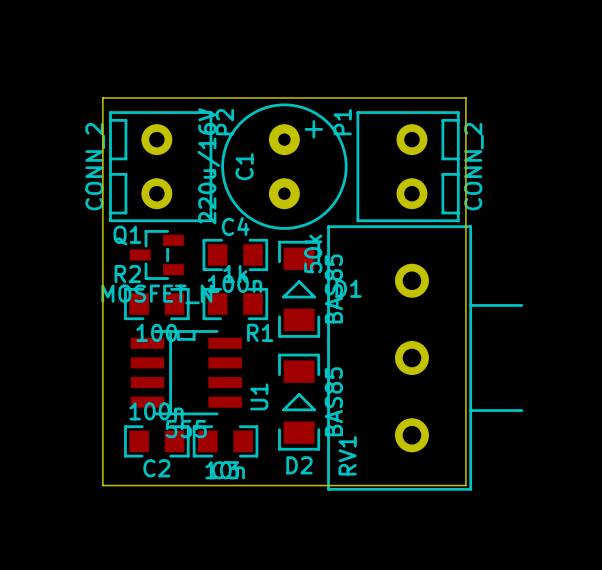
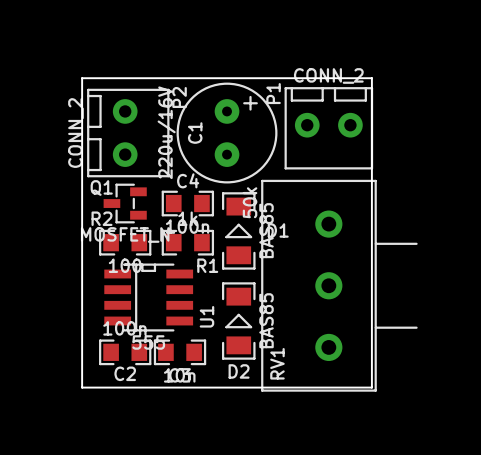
P1 rotation: 0° (408, 166) -> 90° counterclockwise (328, 128)

